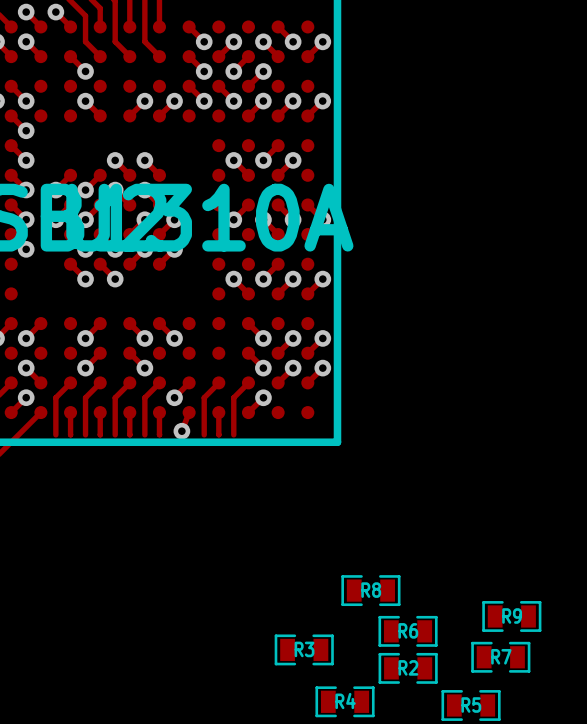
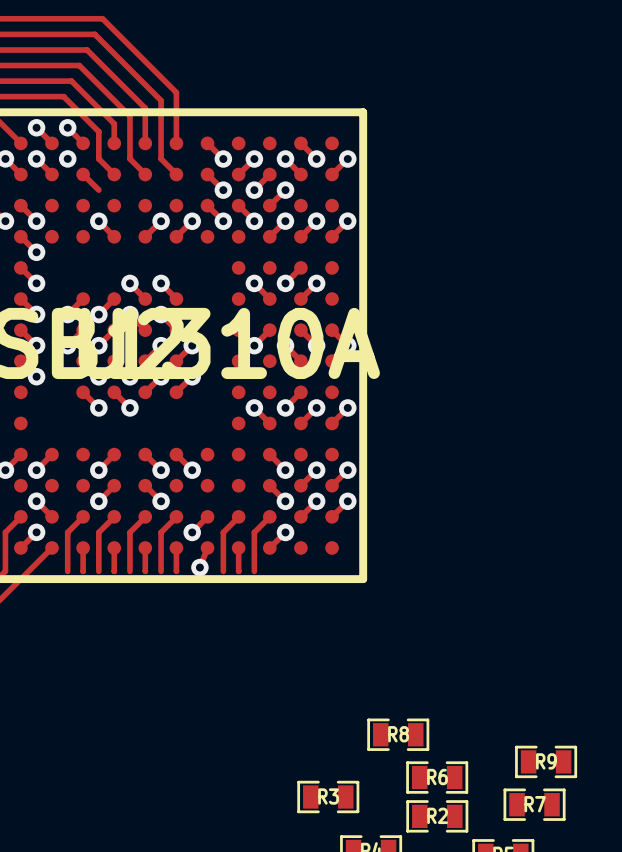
via position: (85, 71) -> (67, 158)

